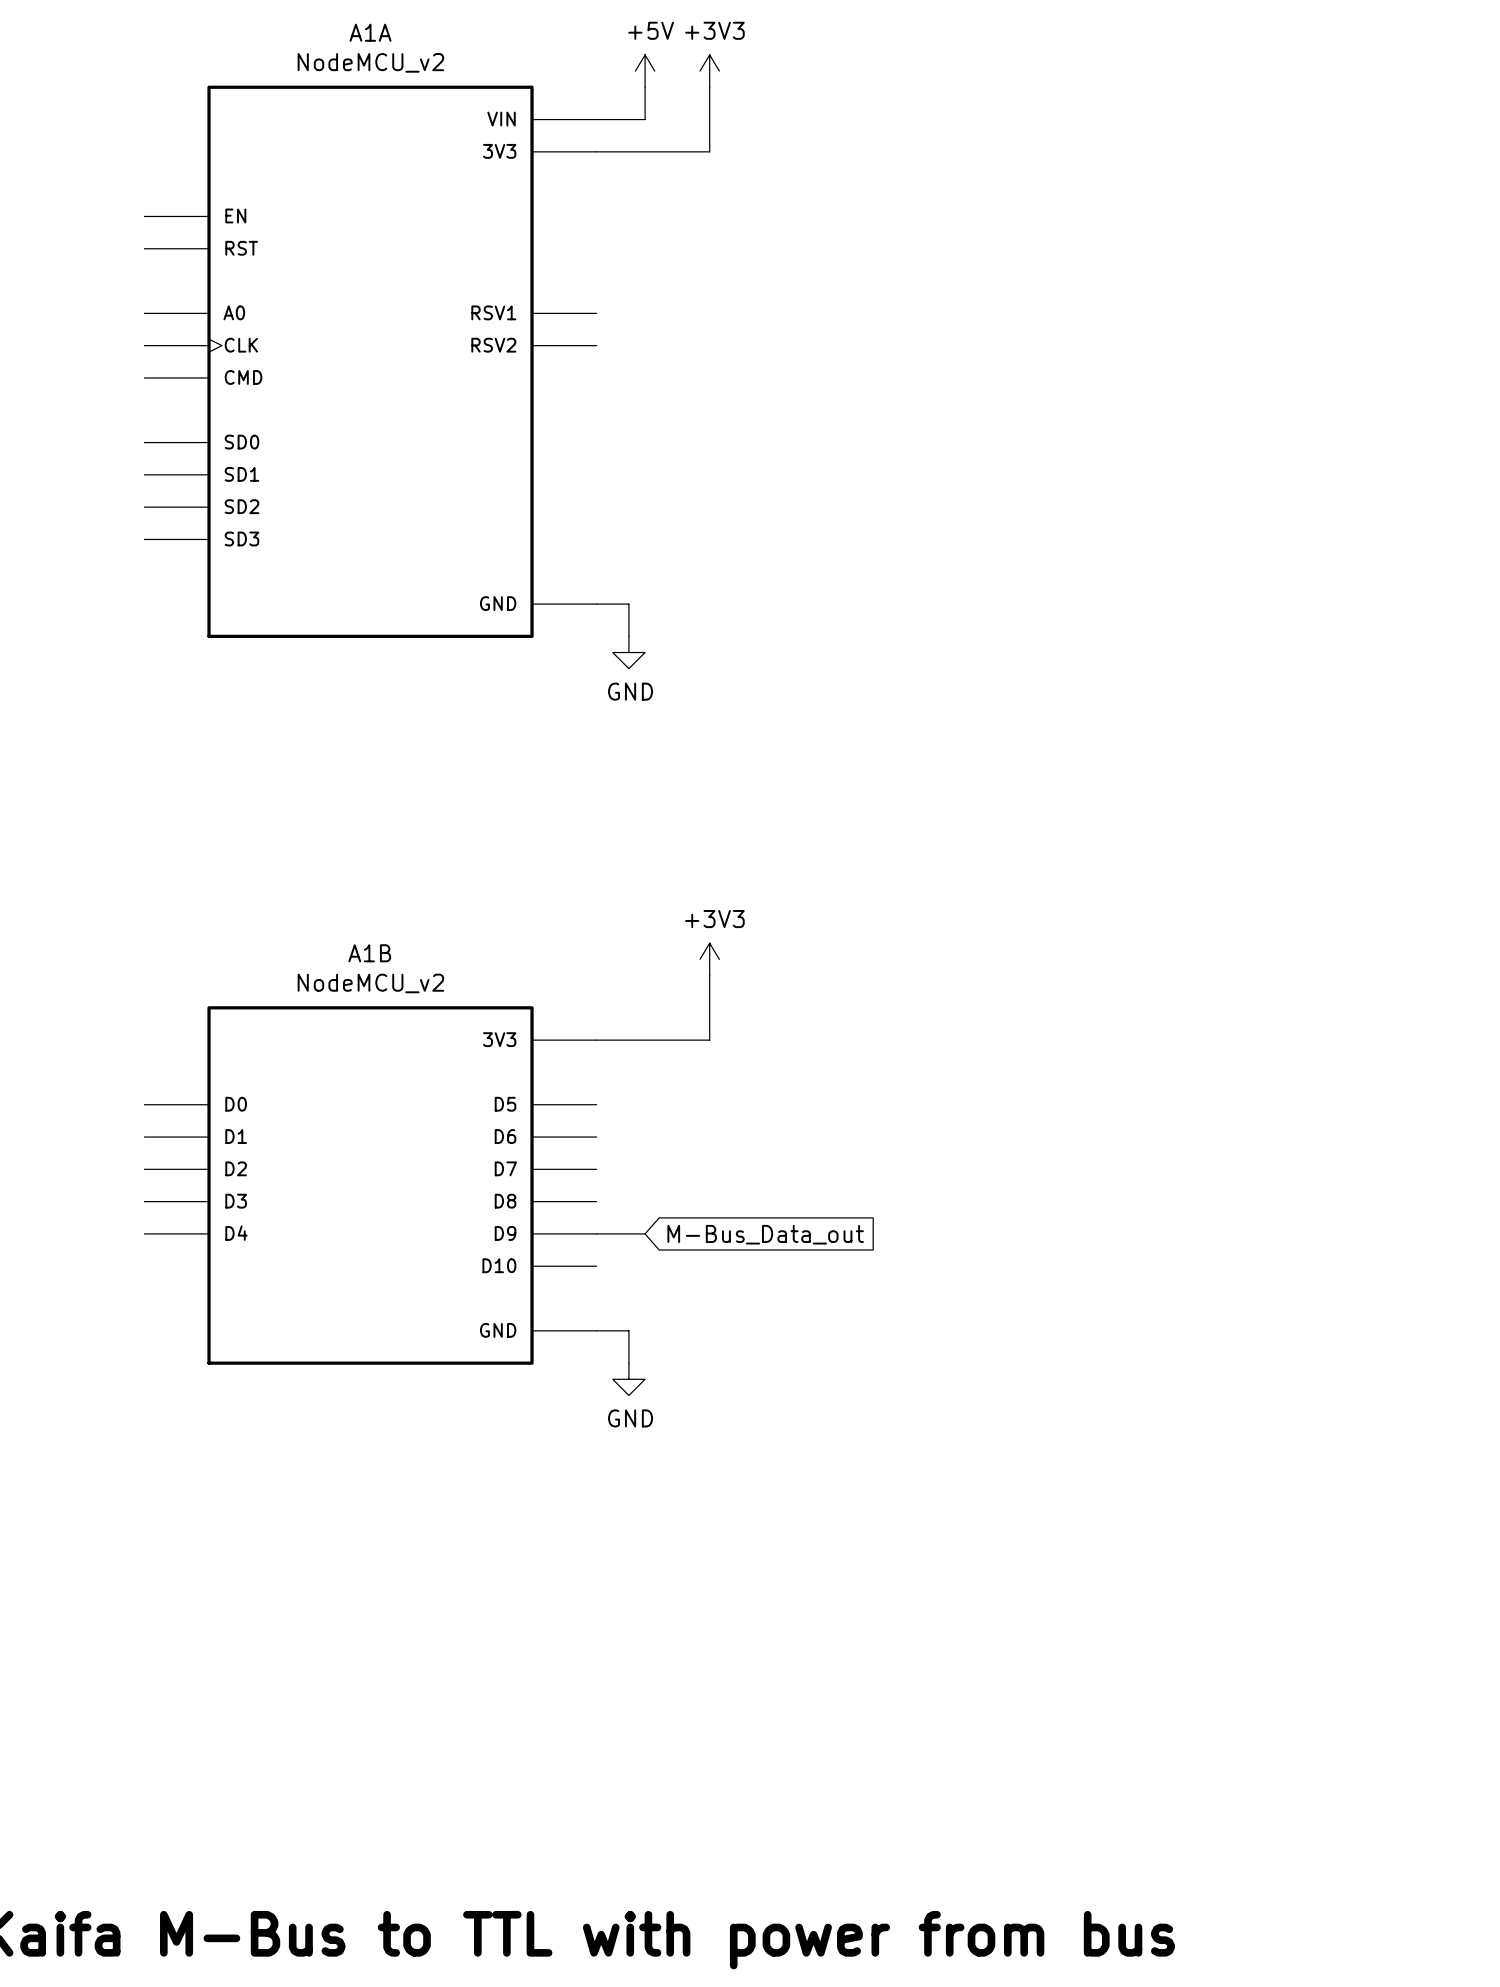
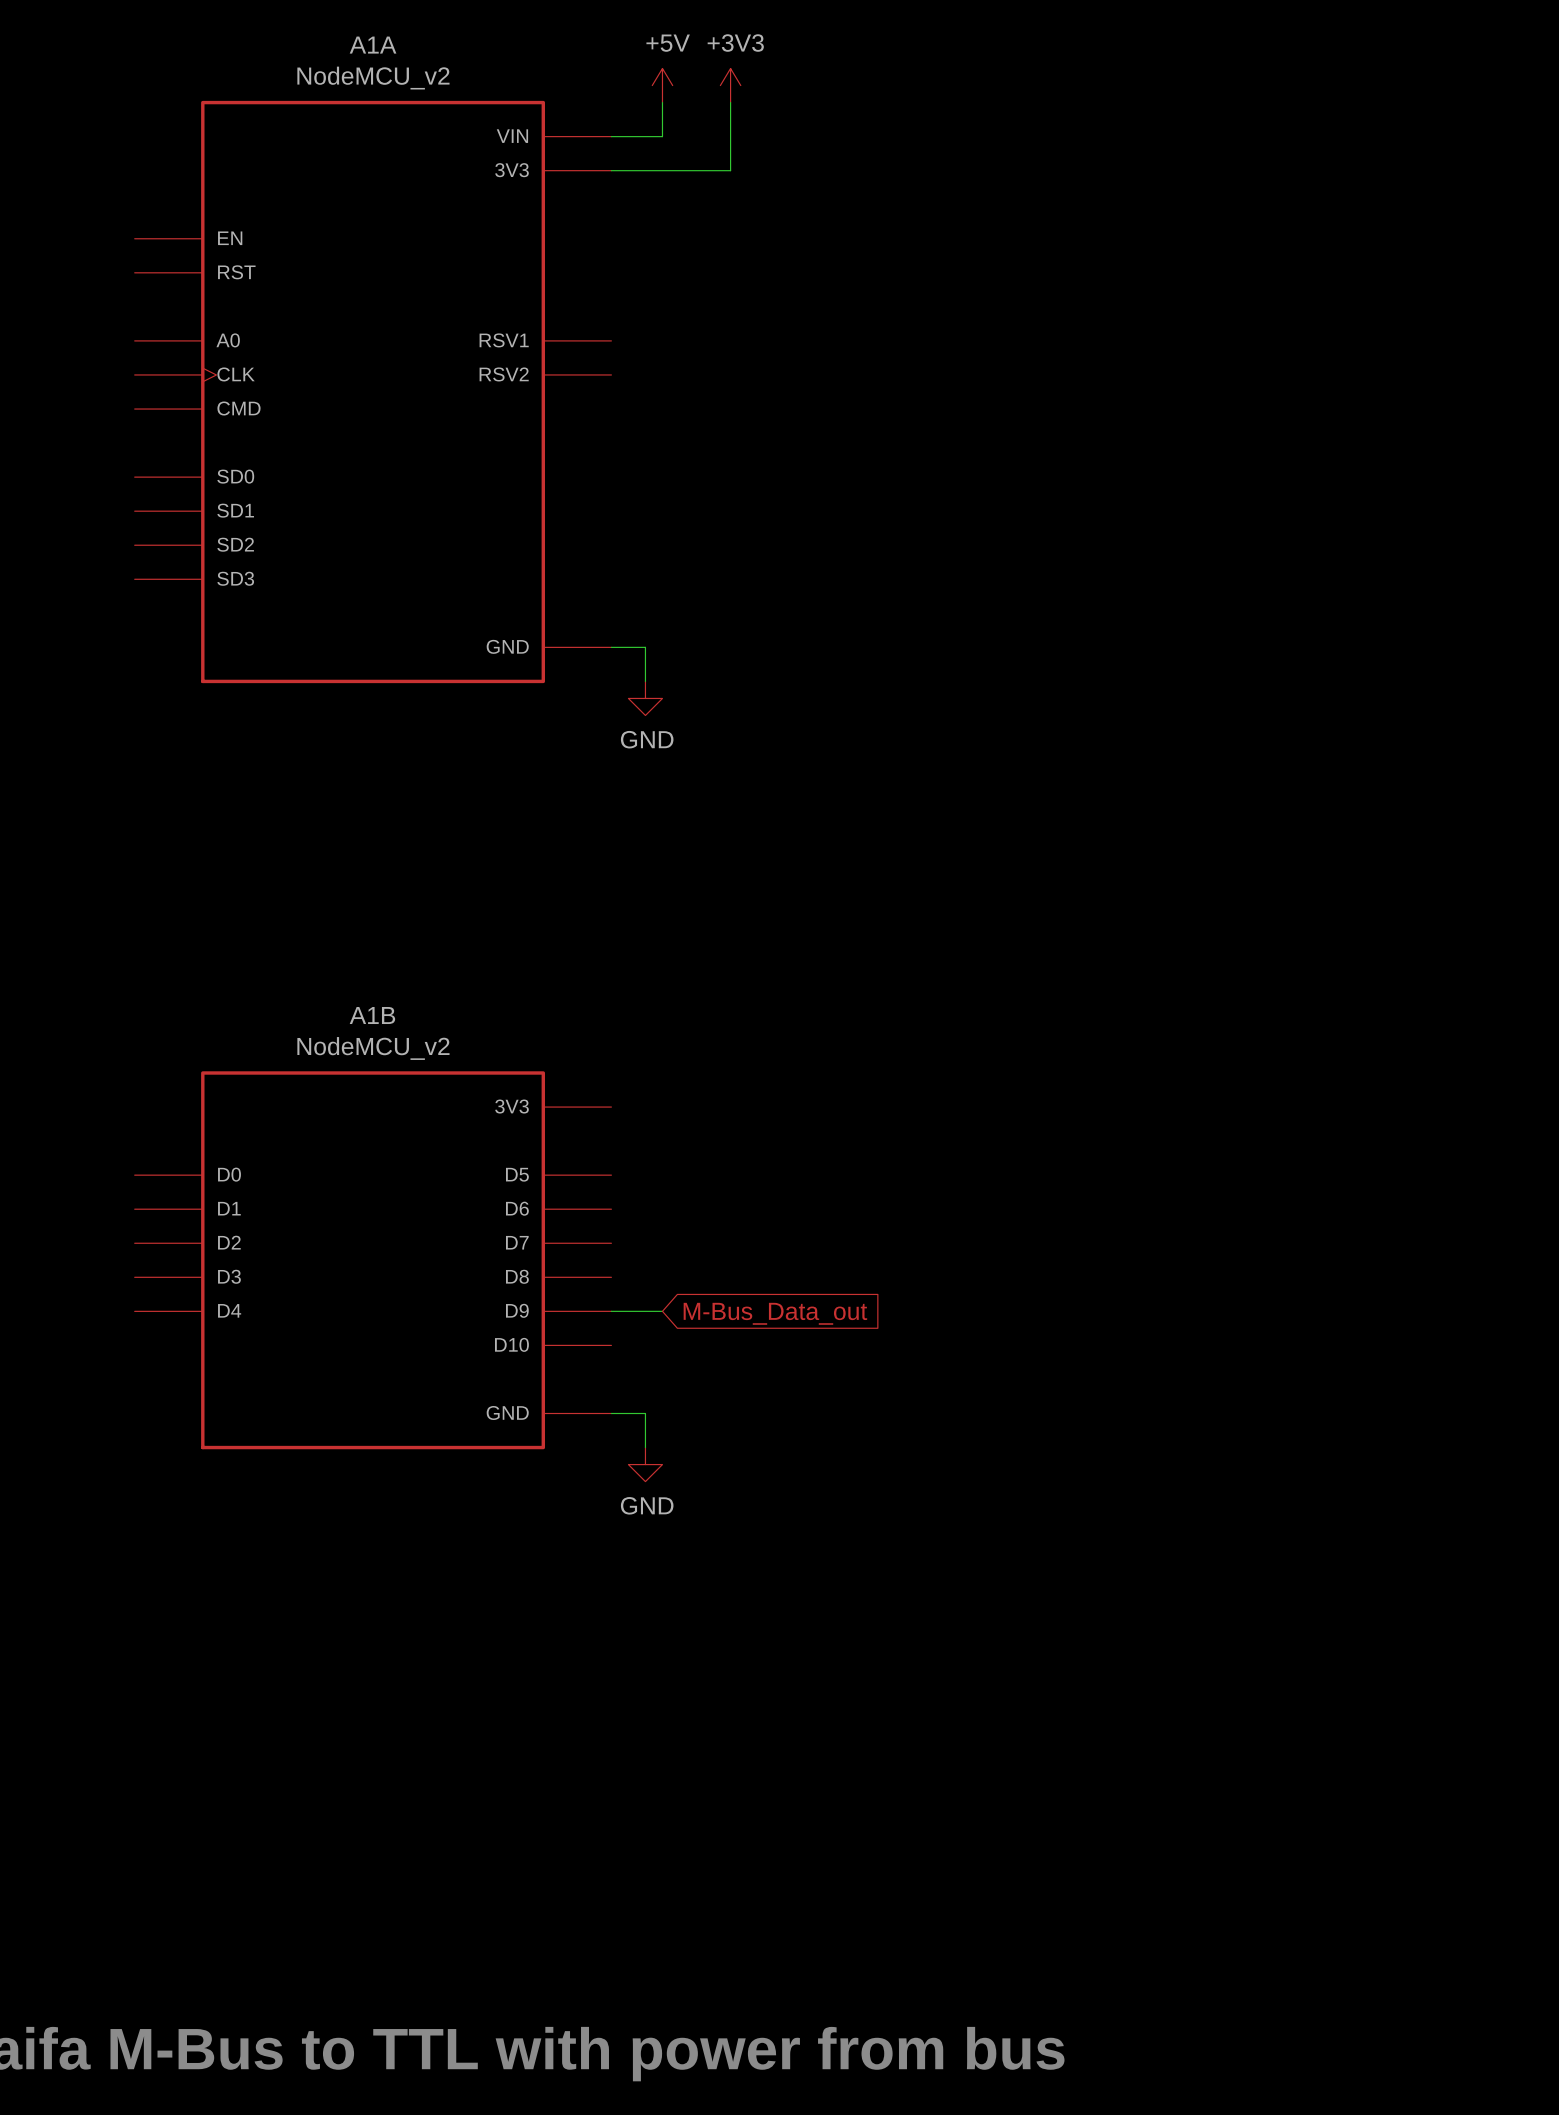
power symbol: +3V3 (709, 959) -> none
wire: (709, 975) (709, 1040) (596, 1040) -> none

